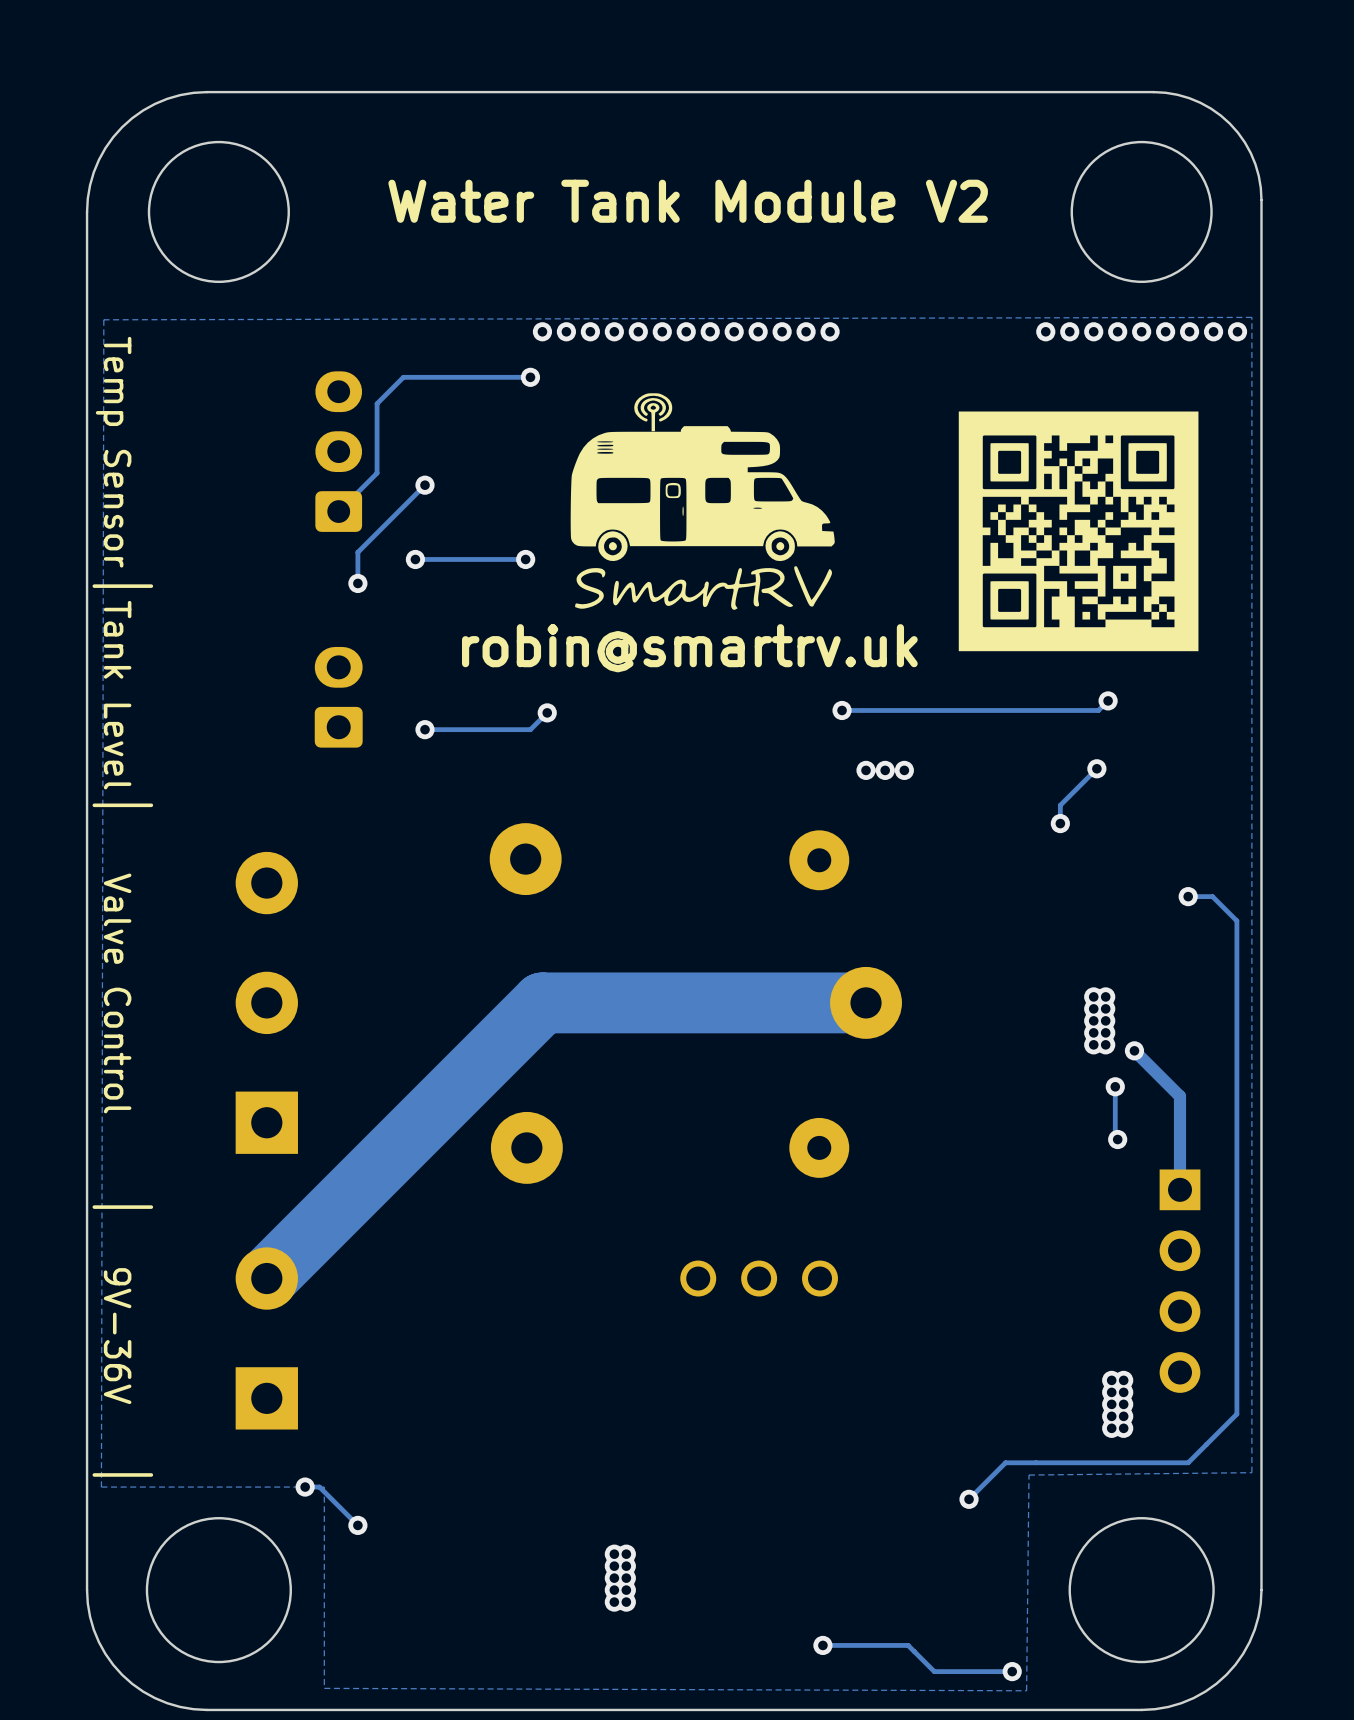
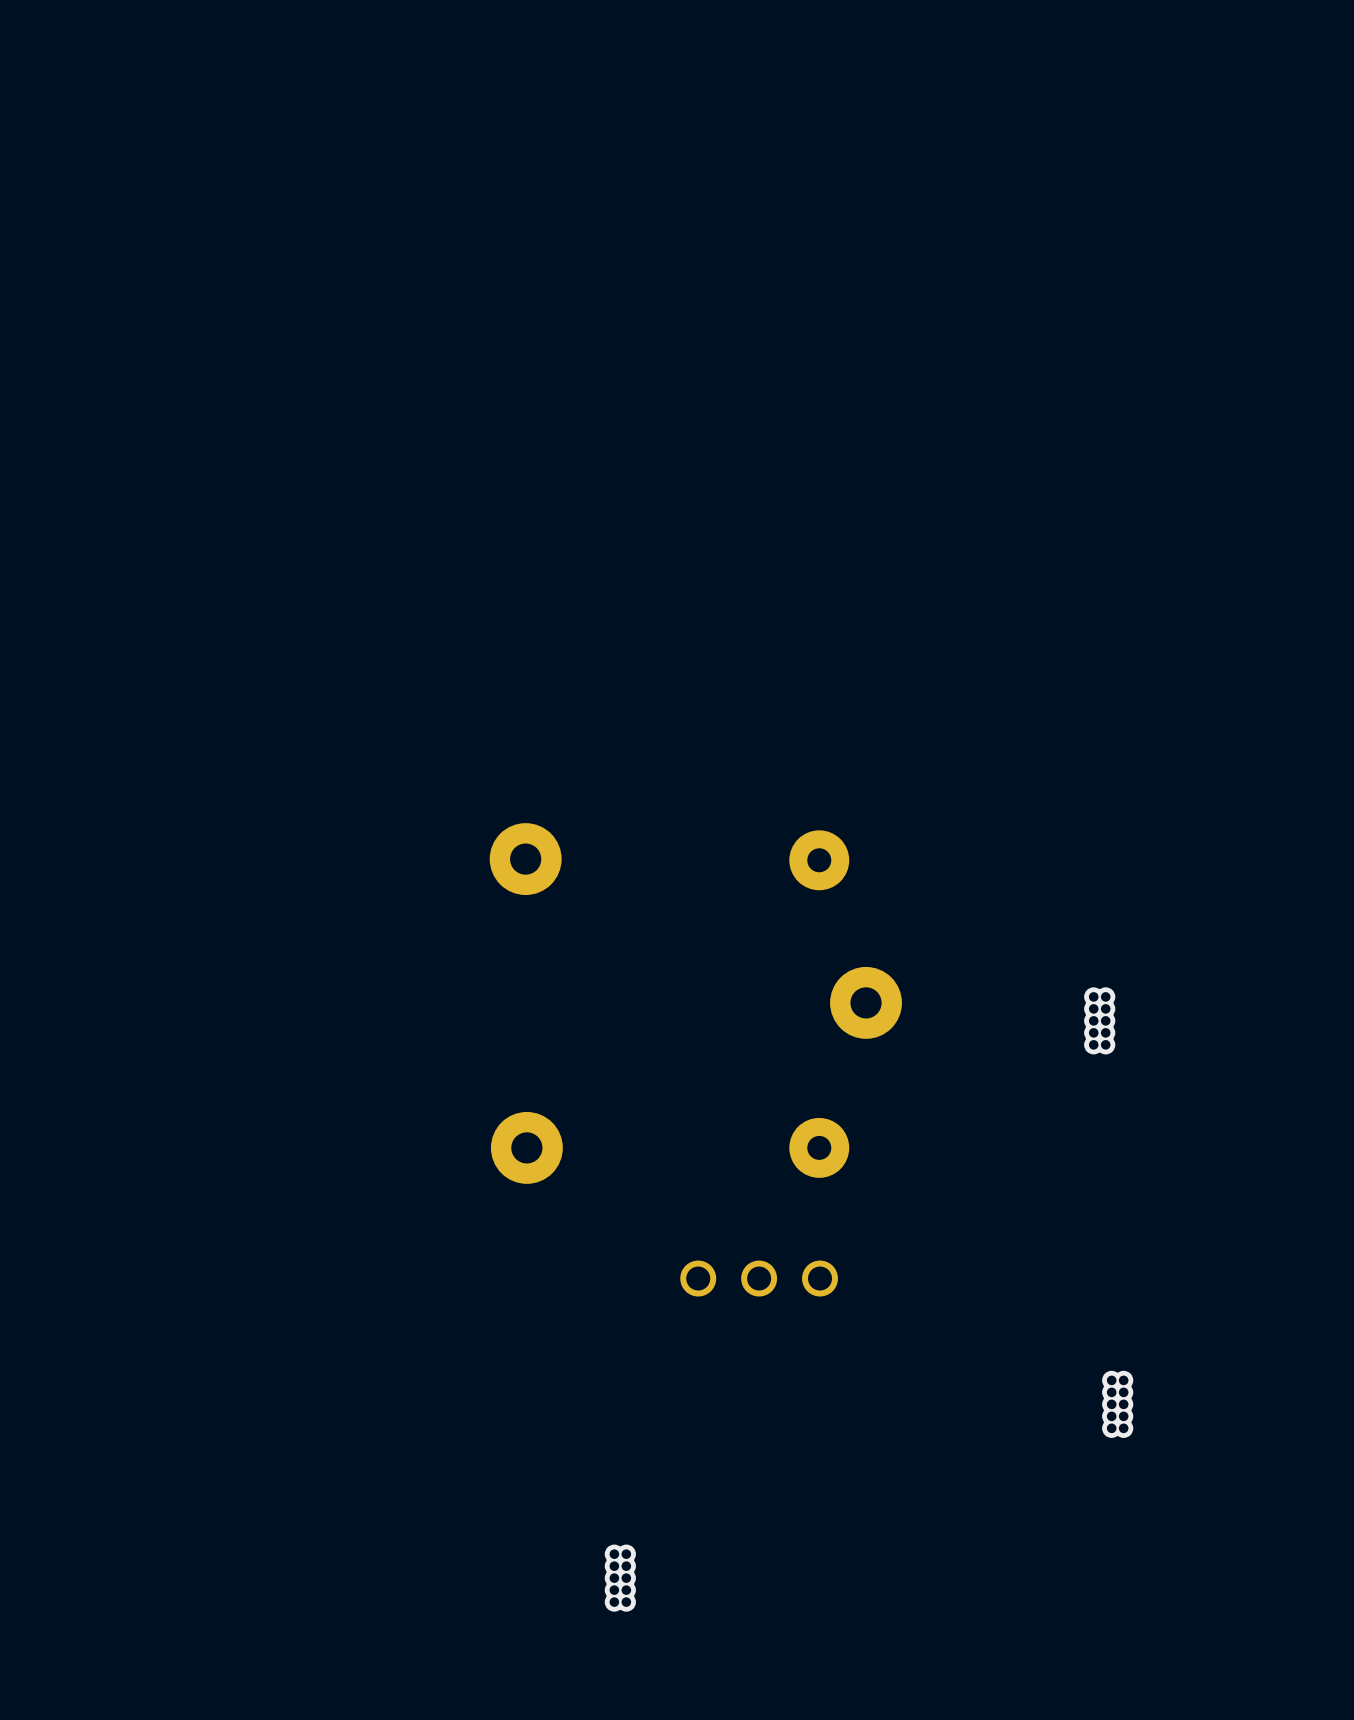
board edge: (1153, 92) (206, 92) (180, 95) (167, 98) (143, 110) (122, 127) (105, 148) (93, 172) (90, 185) (87, 211) (87, 1590) (90, 1616) (98, 1642) (113, 1664) (122, 1674) (143, 1691) (167, 1703) (193, 1709) (206, 1709) (1141, 1709) (1168, 1706) (1193, 1698) (1205, 1691) (1226, 1674) (1243, 1653) (1254, 1629) (1258, 1616) (1261, 1590) (1260, 187) (1250, 153) (1237, 132) (1220, 115) (1189, 98) (1153, 92) -> none
round board edge: [147, 140, 290, 284] -> none
round board edge: [1070, 140, 1213, 284] -> none
text: Water Tank Module V2 (688, 201) -> none
zone outline: (1251, 317) (1251, 1472) (1029, 1475) (1026, 1690) (324, 1688) (324, 1487) (101, 1487) (103, 319) (1251, 317) -> none
via: (542, 331) -> none
via: (566, 331) -> none
via: (590, 331) -> none
via: (614, 331) -> none
via: (638, 331) -> none
via: (662, 331) -> none
via: (686, 331) -> none
via: (710, 331) -> none
via: (734, 331) -> none
via: (758, 331) -> none
via: (782, 331) -> none
via: (806, 331) -> none
via: (830, 331) -> none
via: (1045, 331) -> none
via: (1069, 331) -> none
via: (1093, 331) -> none
via: (1117, 331) -> none
via: (1141, 331) -> none
via: (1165, 331) -> none
via: (1189, 331) -> none
via: (1213, 331) -> none
via: (1237, 331) -> none
track: (530, 377) (403, 377) (377, 403) (377, 473) (338, 511) -> none
via: (530, 377) -> none
drawing: [570, 393, 835, 610] -> none
drawing: [958, 411, 1199, 652] -> none
part: (338, 451) -> none
text: Temp Sensor (113, 452) -> none
track: (425, 485) (357, 552) (357, 583) -> none
via: (425, 485) -> none
via: (415, 559) -> none
track: (525, 559) (415, 559) -> none
via: (525, 559) -> none
via: (357, 583) -> none
line: (151, 586) (94, 586) -> none
text: robin@smartrv.uk (689, 648) -> none
text: Tank Level (117, 695) -> none
part: (338, 697) -> none
track: (1108, 700) (1098, 710) (842, 710) -> none
via: (1108, 700) -> none
via: (842, 710) -> none
track: (547, 712) (530, 729) (425, 729) -> none
via: (547, 712) -> none
via: (425, 729) -> none
track: (1096, 768) (1060, 805) (1060, 823) -> none
via: (1096, 768) -> none
via: (866, 770) -> none
via: (885, 770) -> none
via: (904, 770) -> none
line: (151, 805) (94, 805) -> none
via: (1060, 823) -> none
track: (1188, 896) (1212, 896) (1236, 920) (1236, 1414) (1188, 1462) (1005, 1462) (969, 1499) -> none
via: (1188, 896) -> none
text: Valve Control (117, 993) -> none
part: (266, 1002) -> none
track: (866, 1002) (542, 1002) (266, 1278) -> none
track: (1134, 1050) (1180, 1096) (1180, 1189) -> none
via: (1134, 1050) -> none
track: (1115, 1086) (1115, 1137) (1117, 1139) -> none
via: (1115, 1086) -> none
via: (1117, 1139) -> none
line: (151, 1207) (94, 1207) -> none
part: (1180, 1281) -> none
text: 9V-36V (117, 1336) -> none
part: (266, 1338) -> none
line: (151, 1474) (94, 1474) -> none
track: (305, 1487) (319, 1487) (357, 1525) -> none
via: (305, 1487) -> none
via: (969, 1499) -> none
round board edge: [145, 1517, 292, 1664] -> none
round board edge: [1068, 1517, 1215, 1664] -> none
via: (357, 1525) -> none
track: (822, 1645) (908, 1645) (934, 1671) (1012, 1671) -> none
via: (822, 1645) -> none
via: (1012, 1671) -> none

